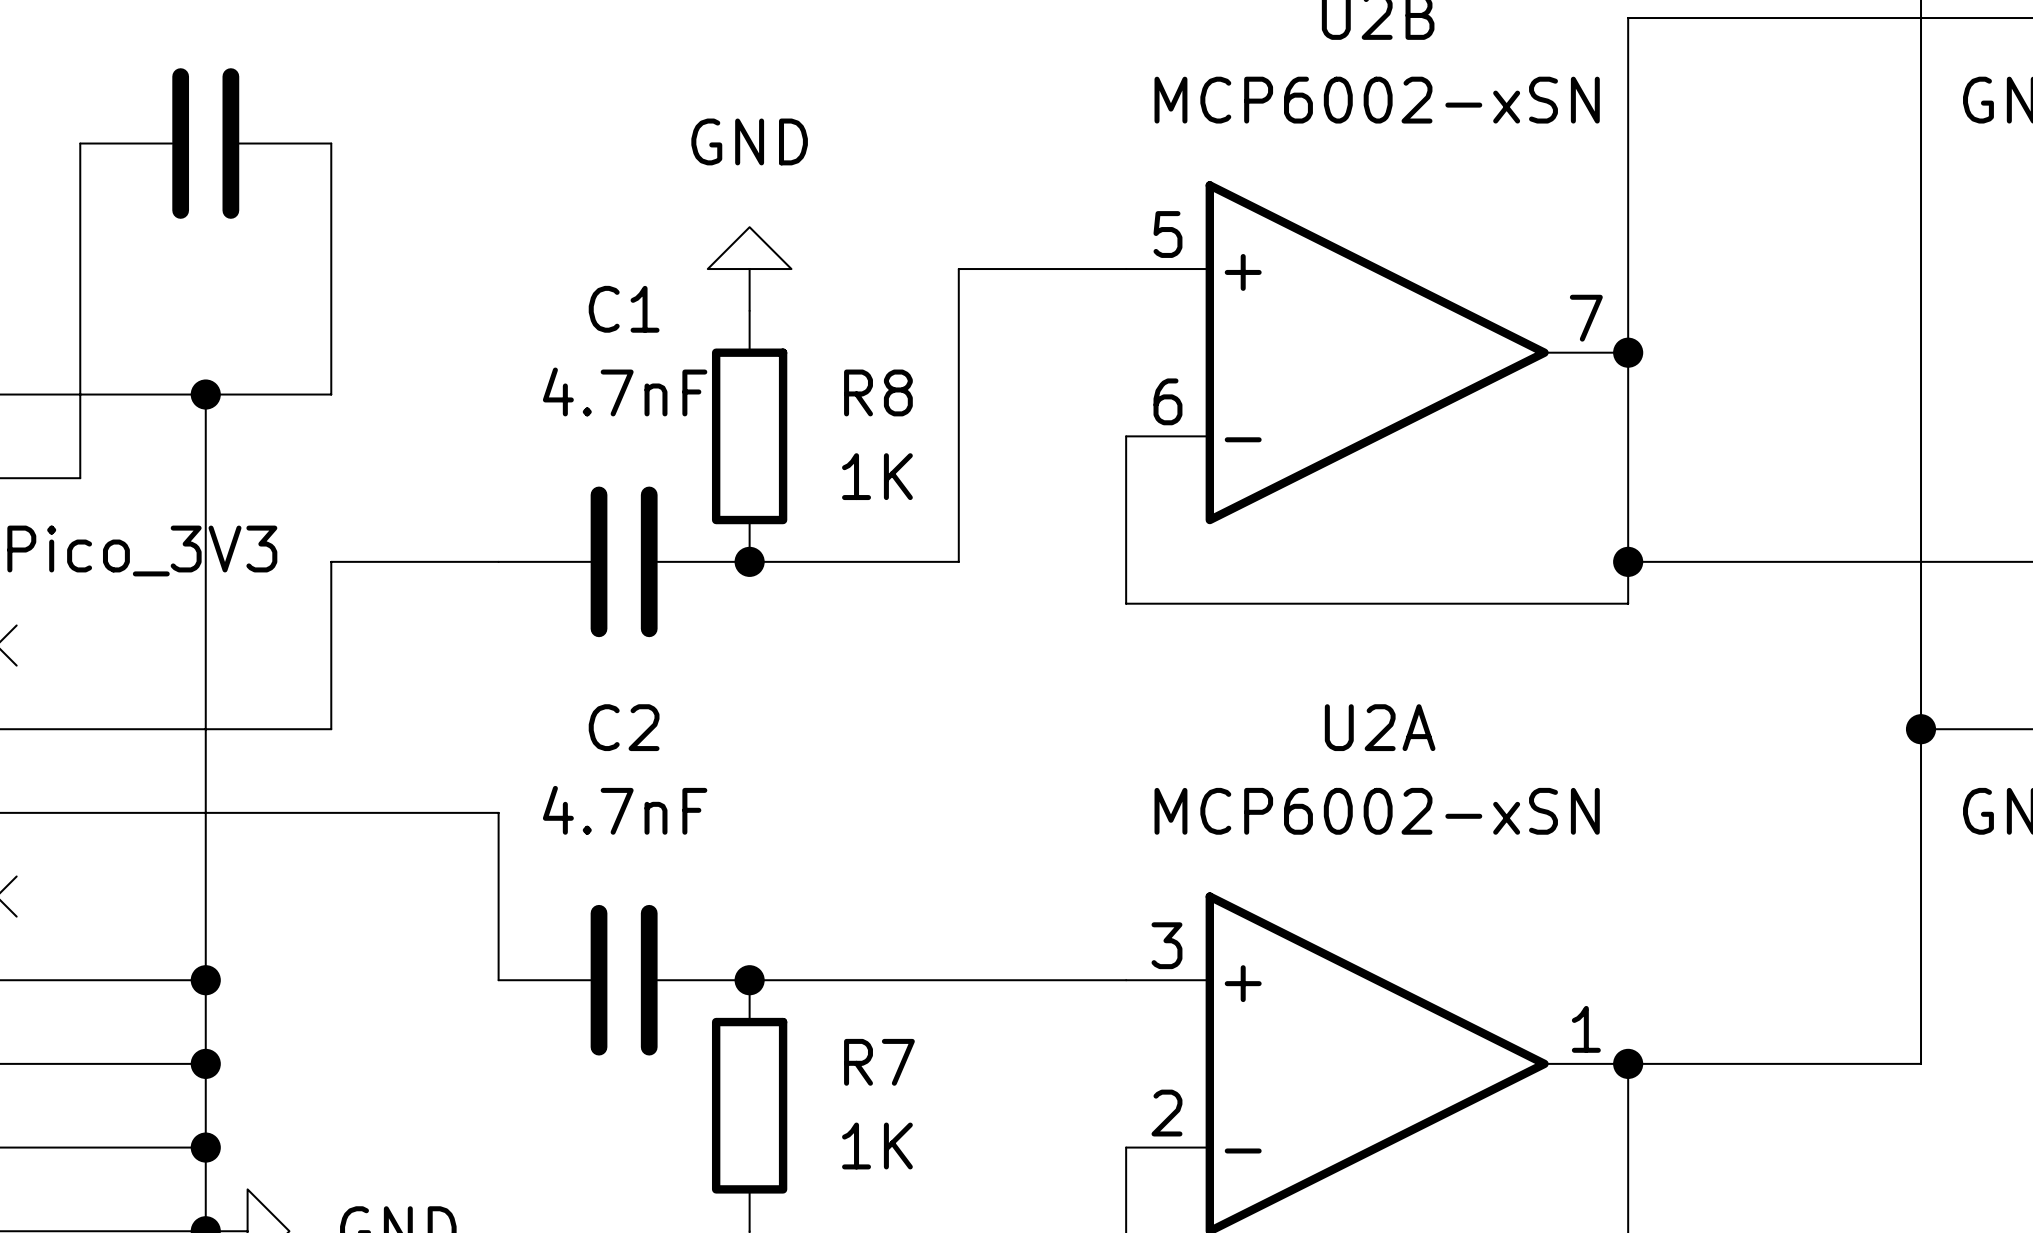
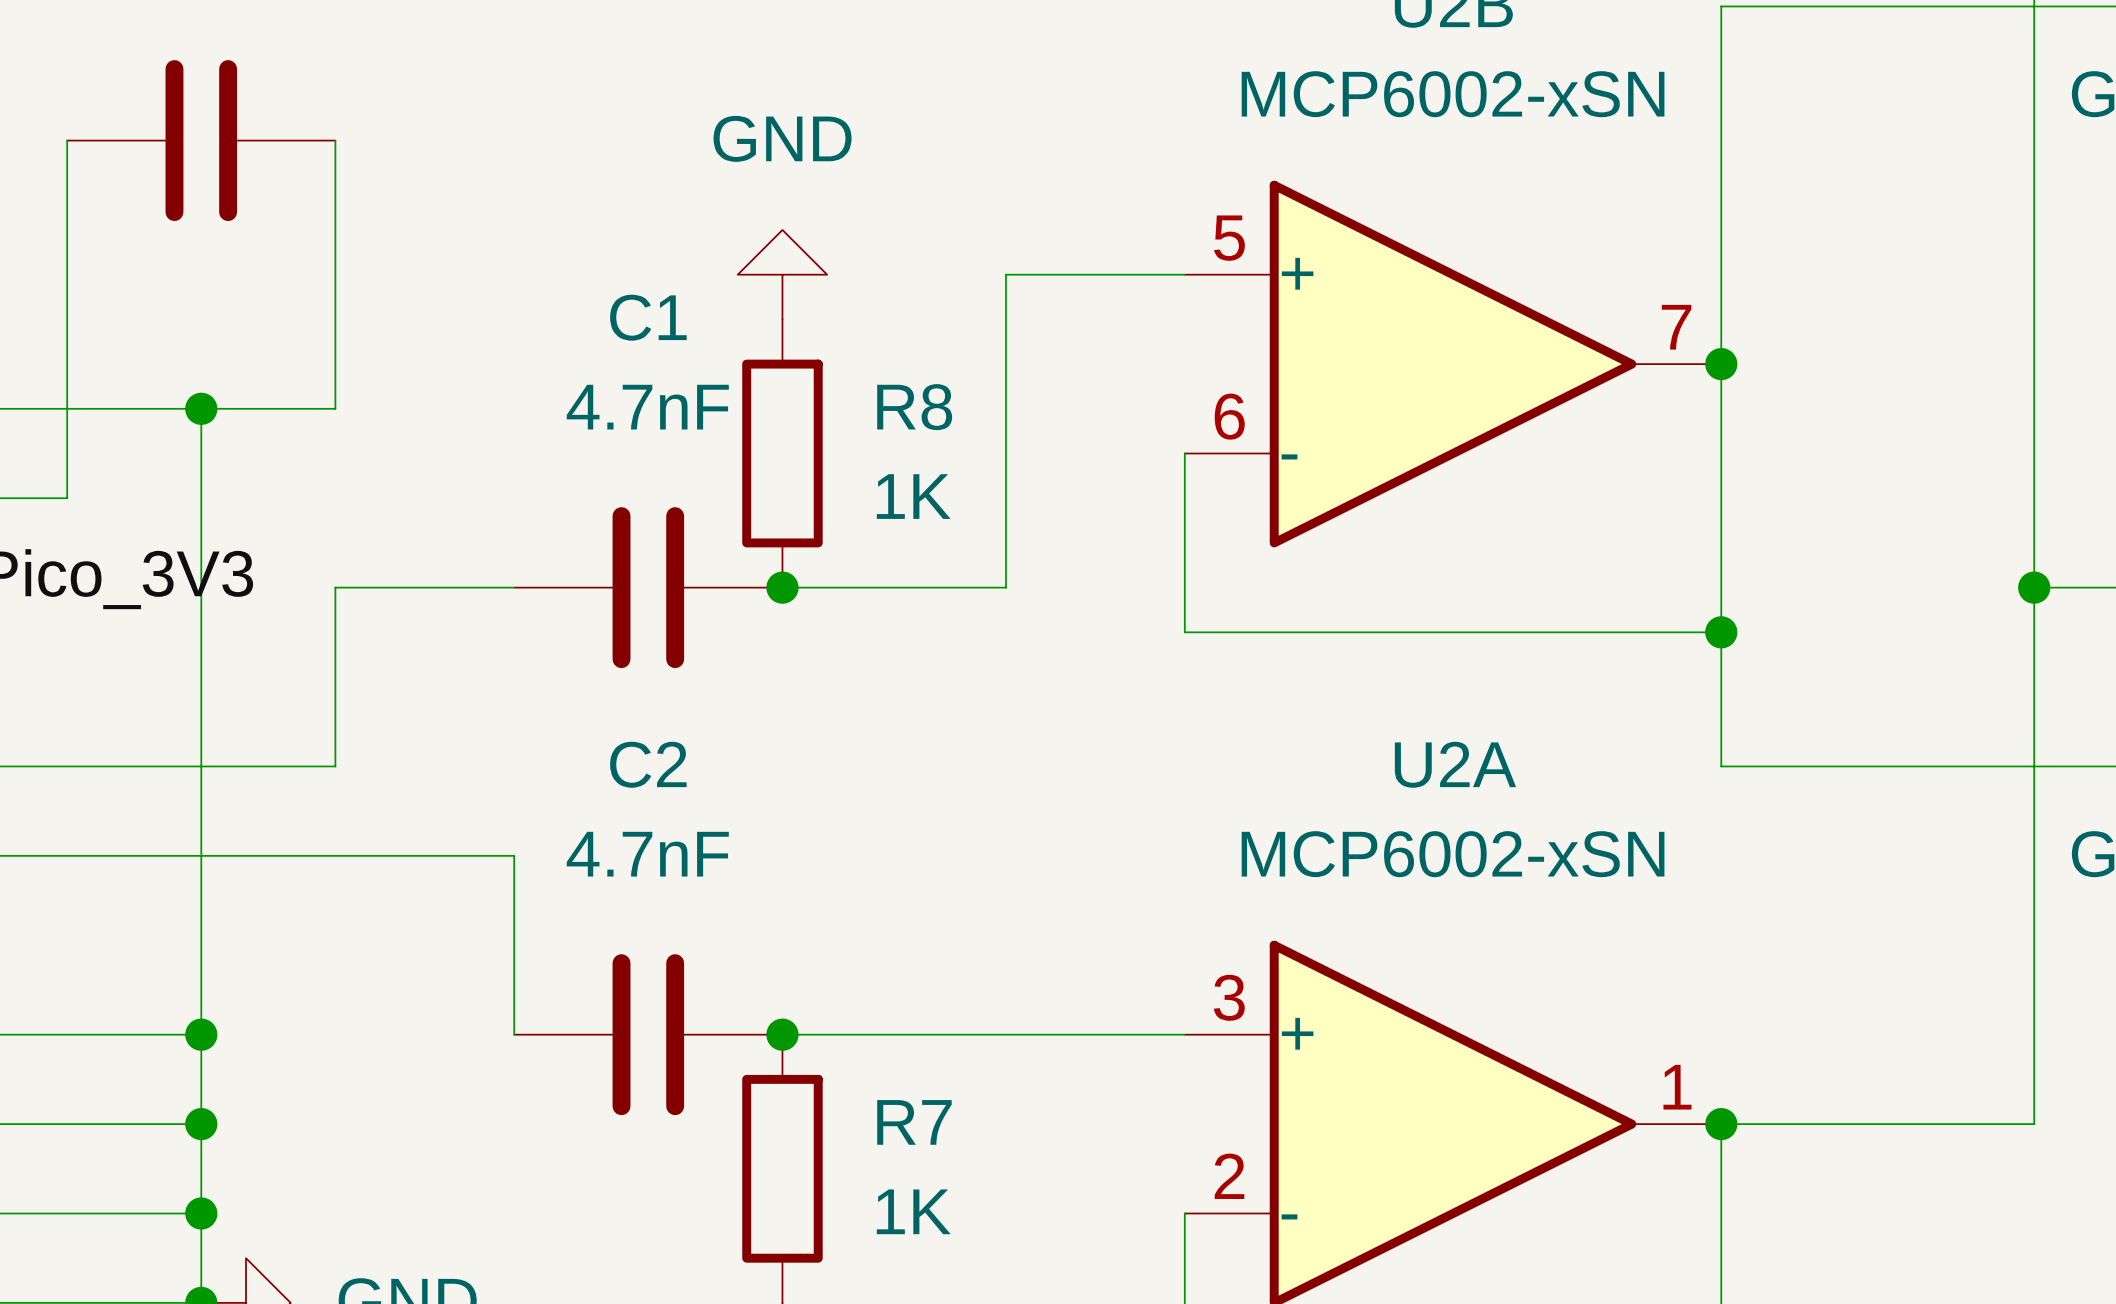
wire: (1628, 561) (1921, 561) -> none
junction position: (1628, 561) -> (1721, 632)
junction: none -> (2034, 587)
wire: none -> (1721, 632) (1721, 766) (2034, 766)
junction: (1921, 729) -> none

